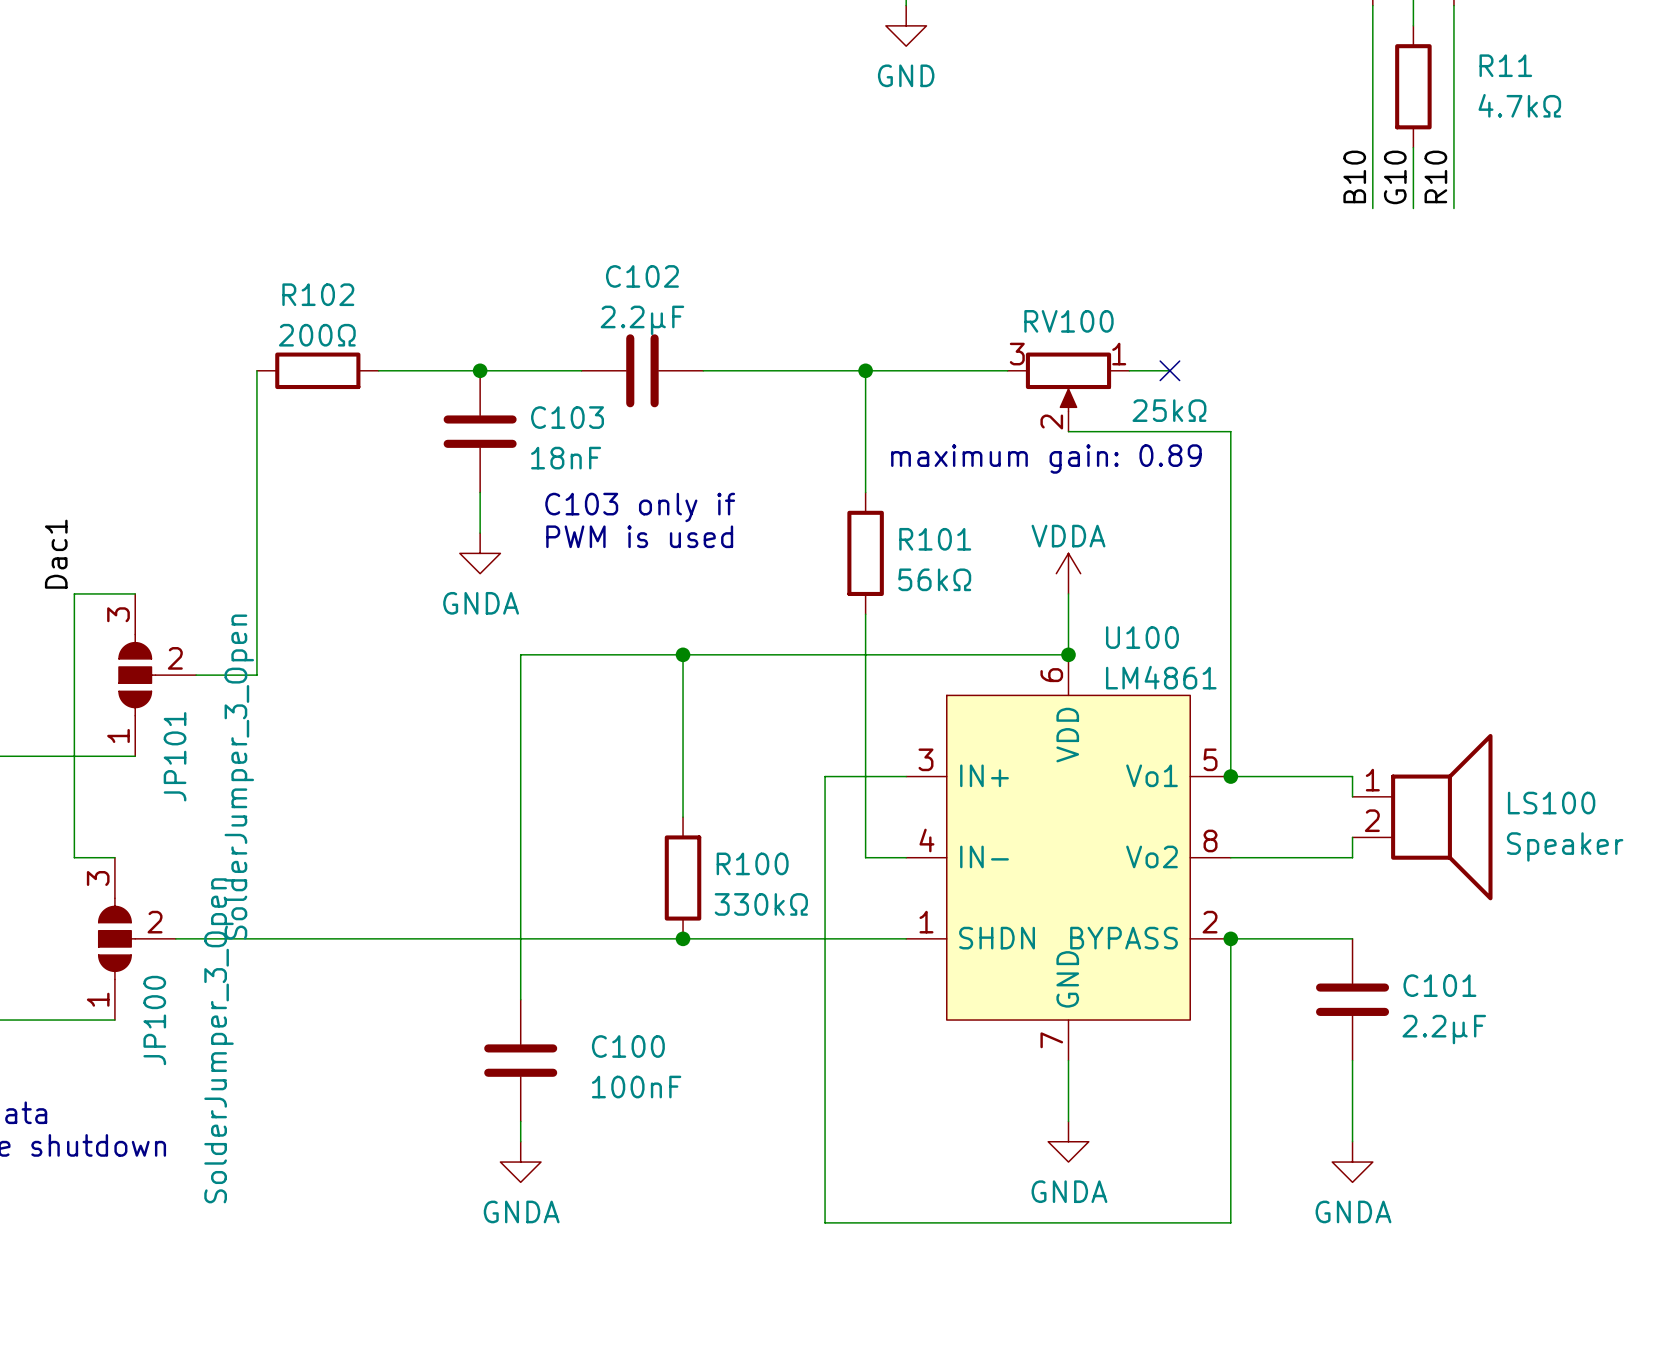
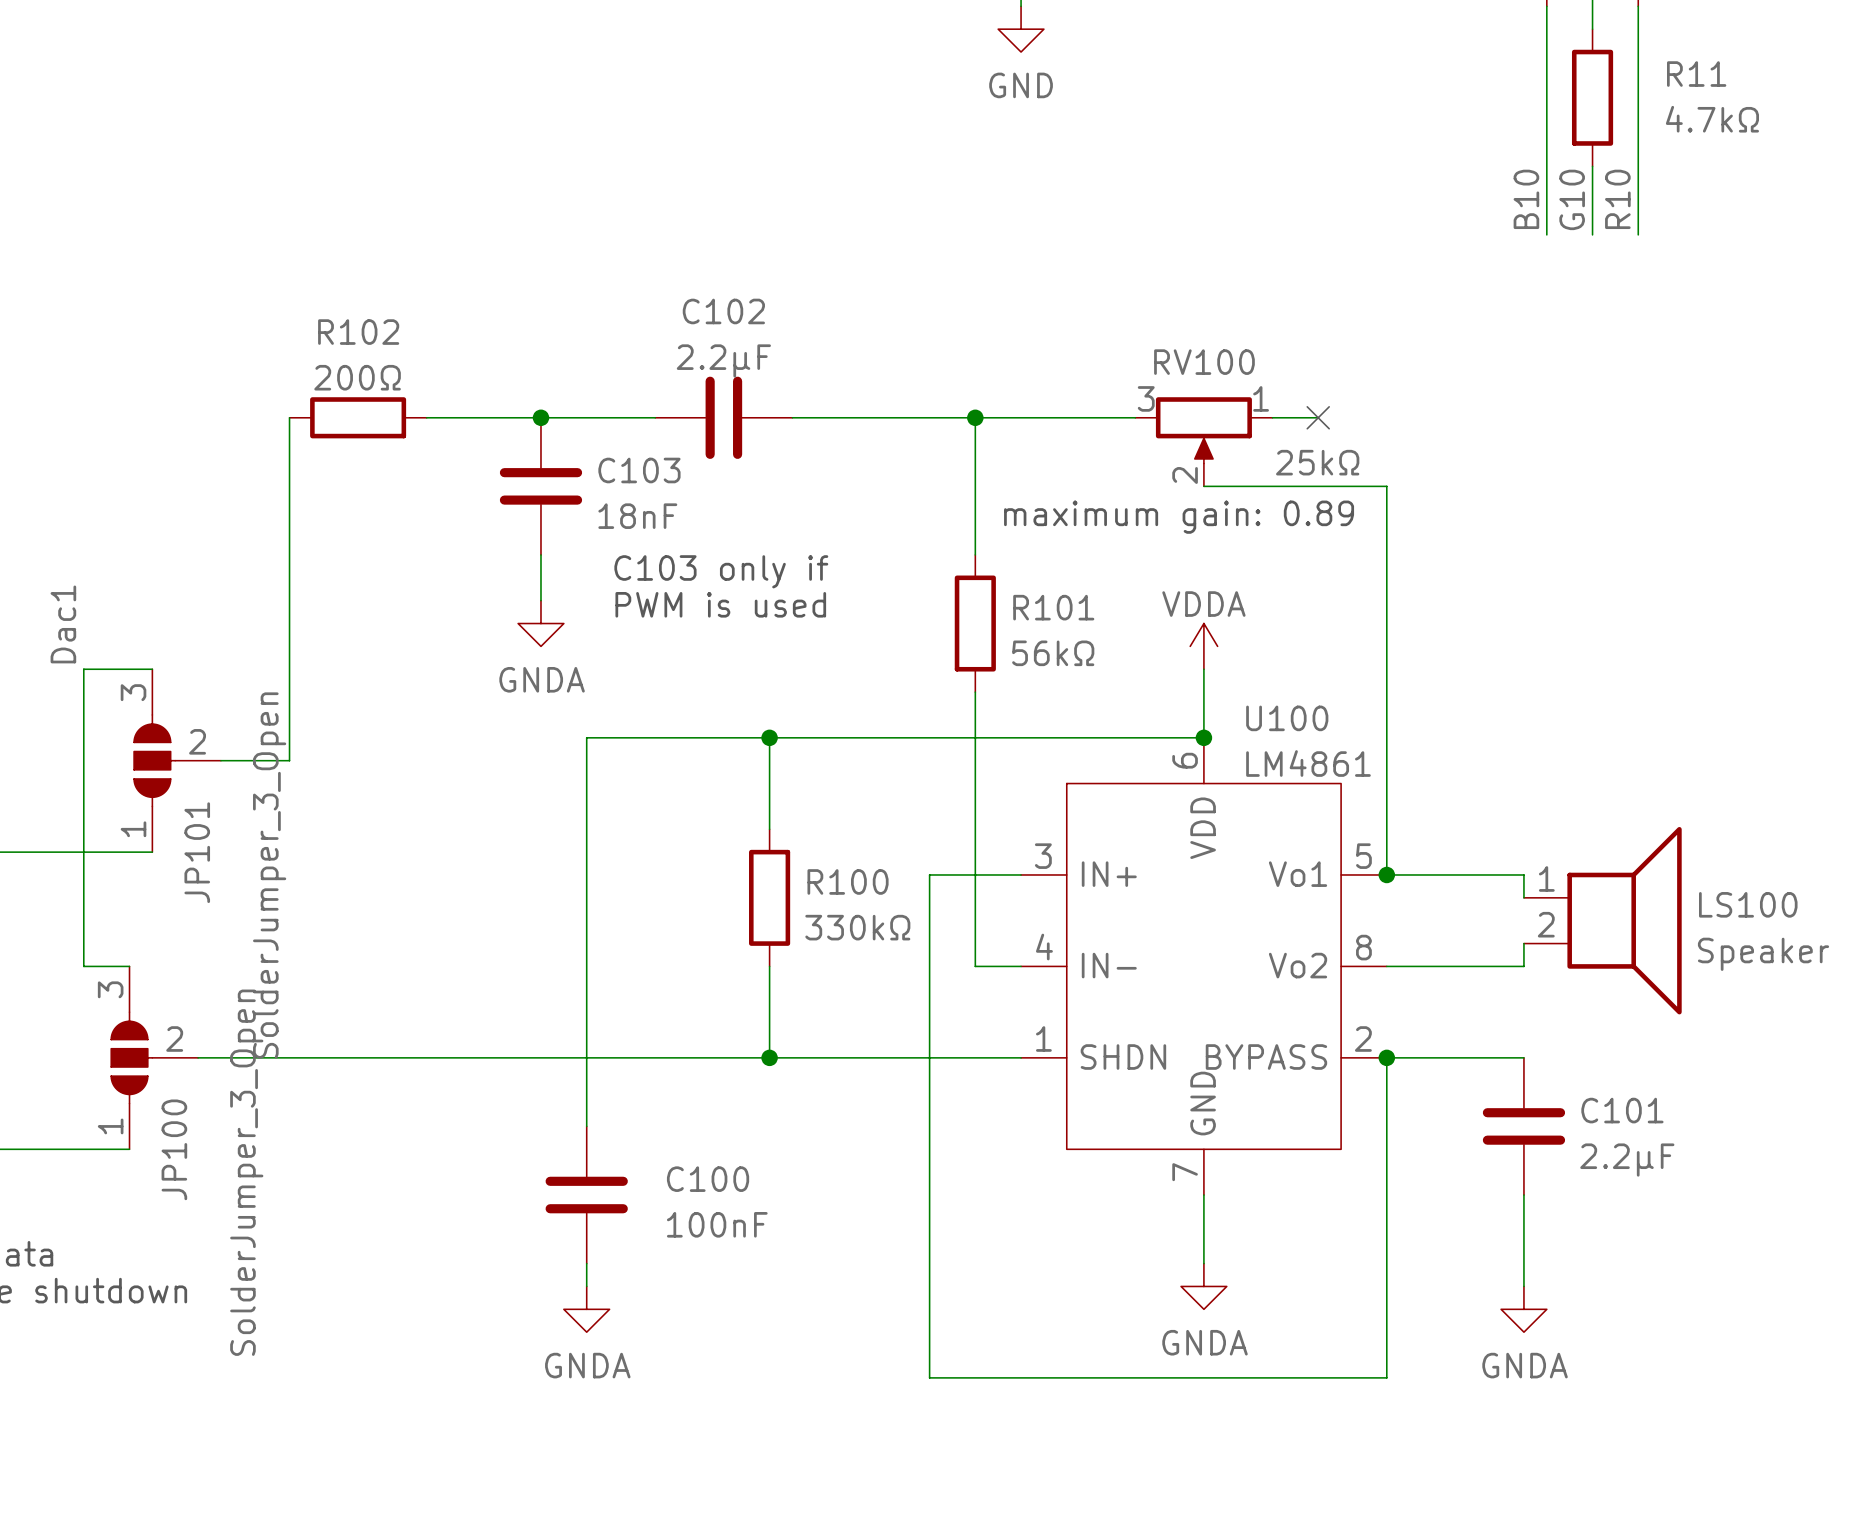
wire: (683, 735) (683, 817) -> (769, 966) (769, 1057)
R100 position: (683, 878) -> (769, 897)

